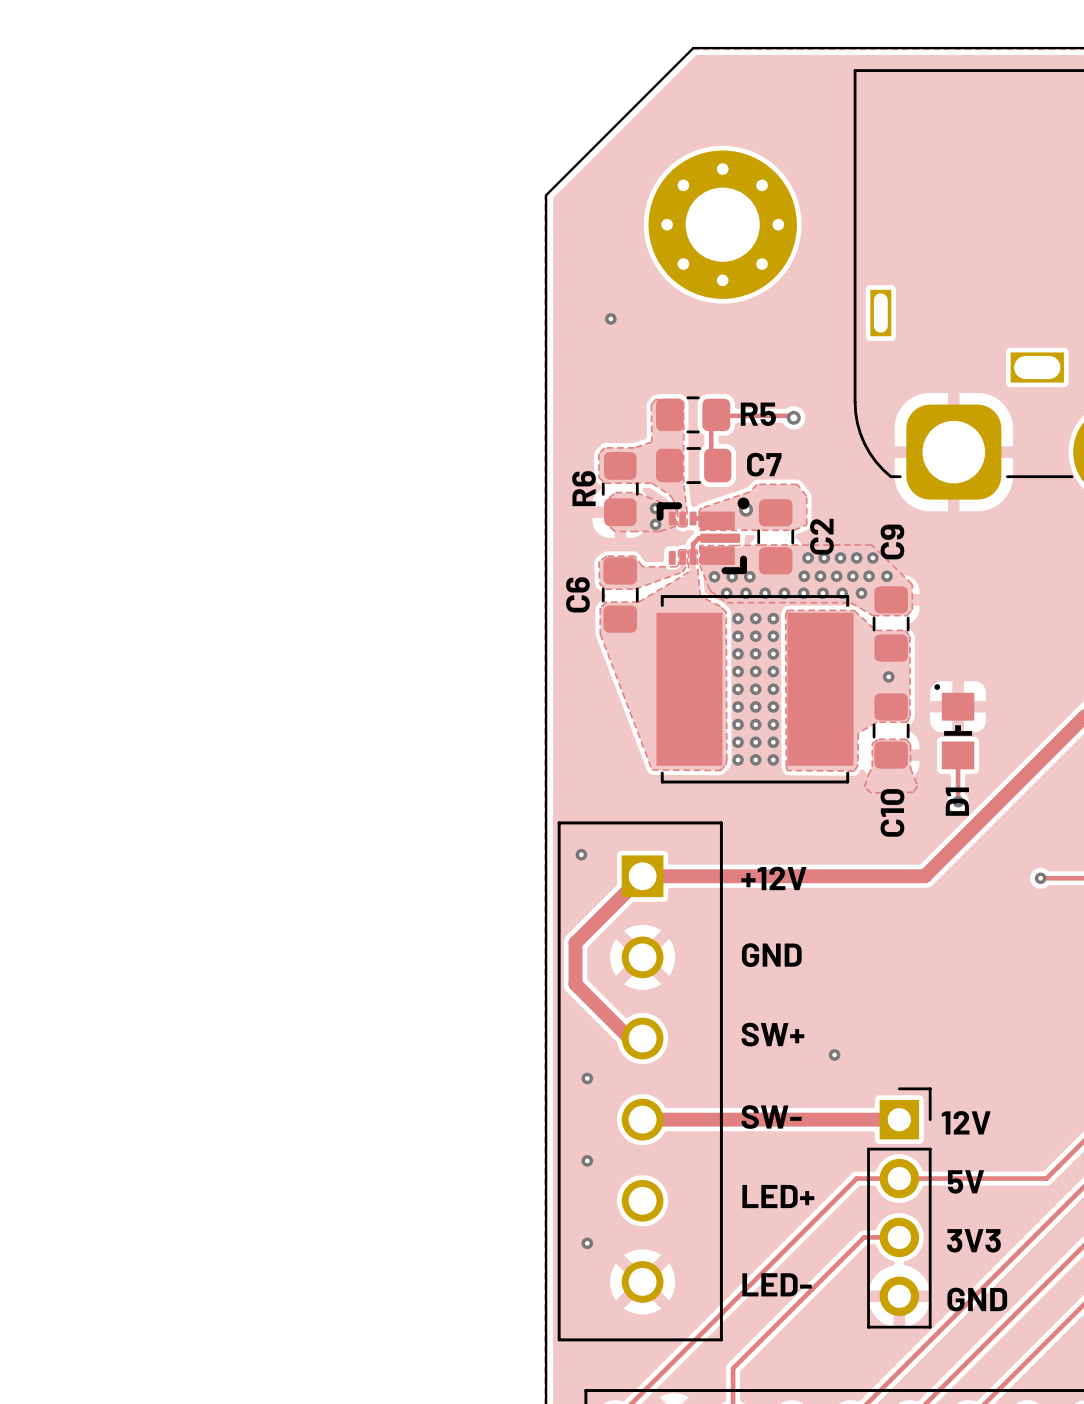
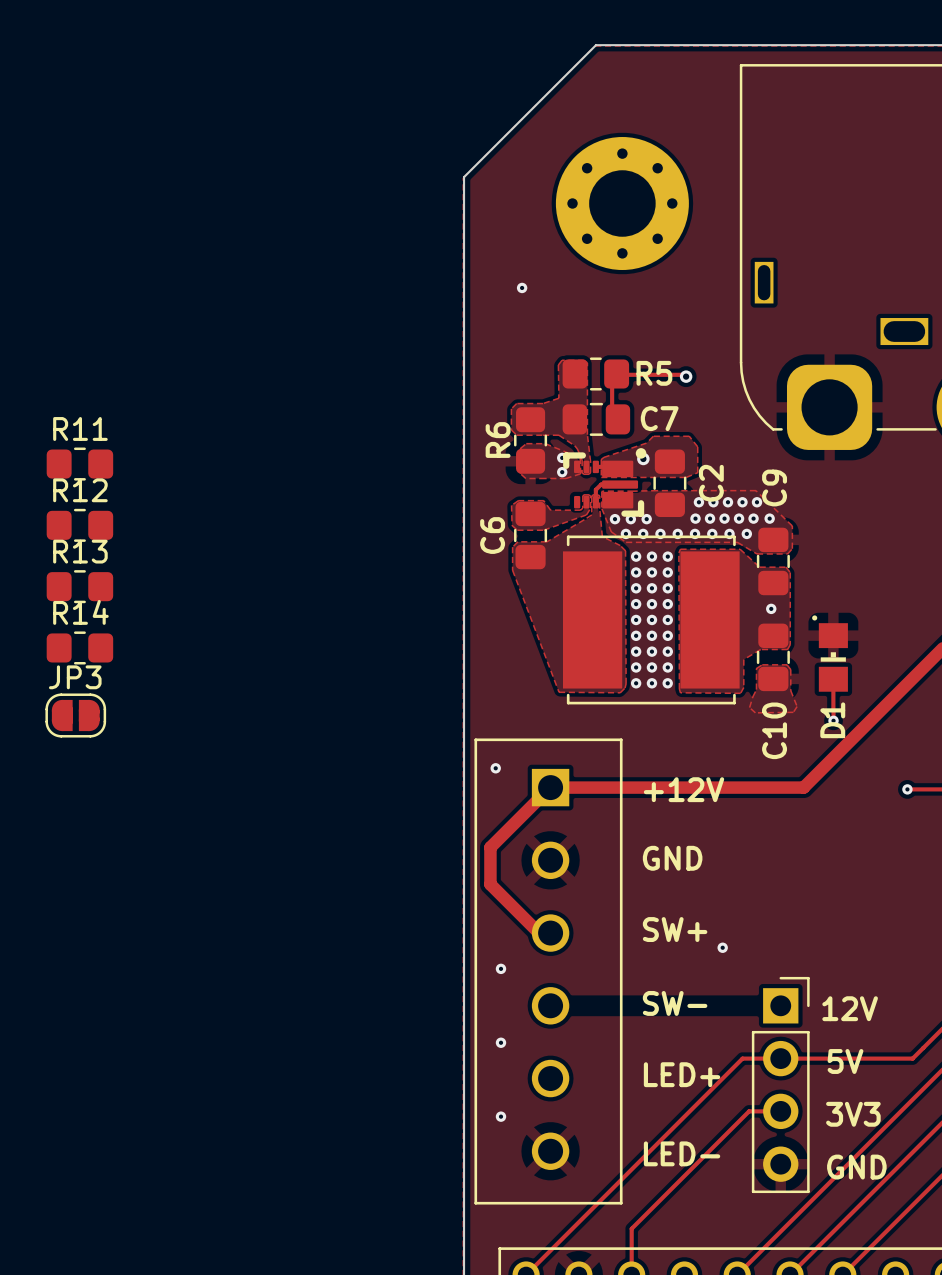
R11: none -> (79, 464)
R12: none -> (79, 525)
R13: none -> (79, 586)
R14: none -> (79, 647)
JP3: none -> (75, 715)
track: (642, 1119) (899, 1119) -> none

